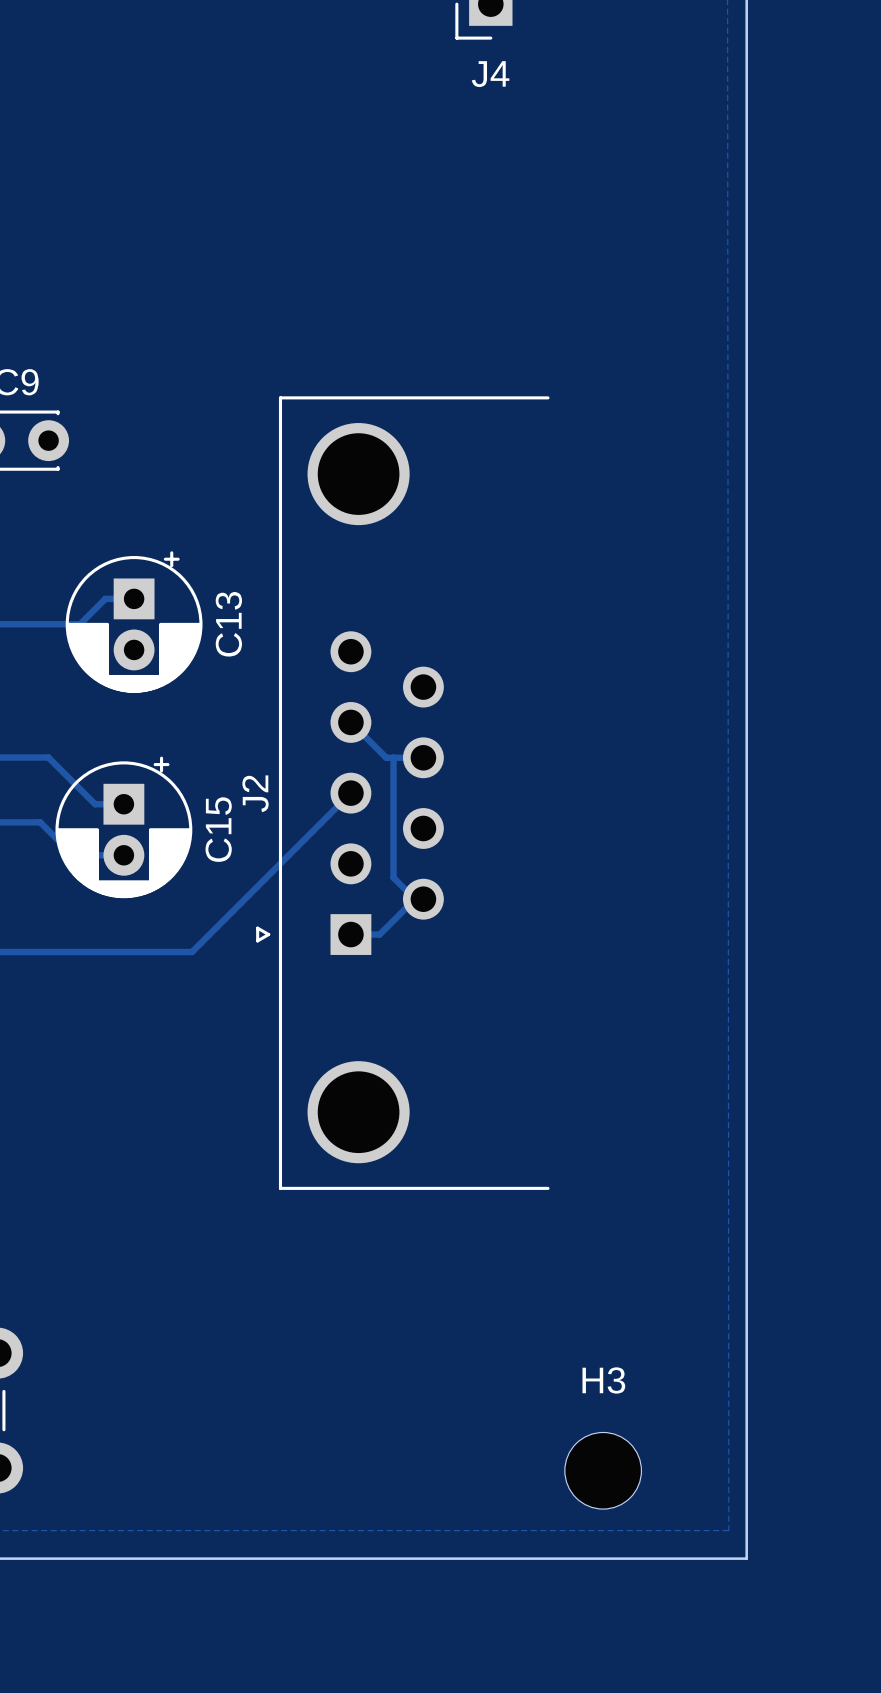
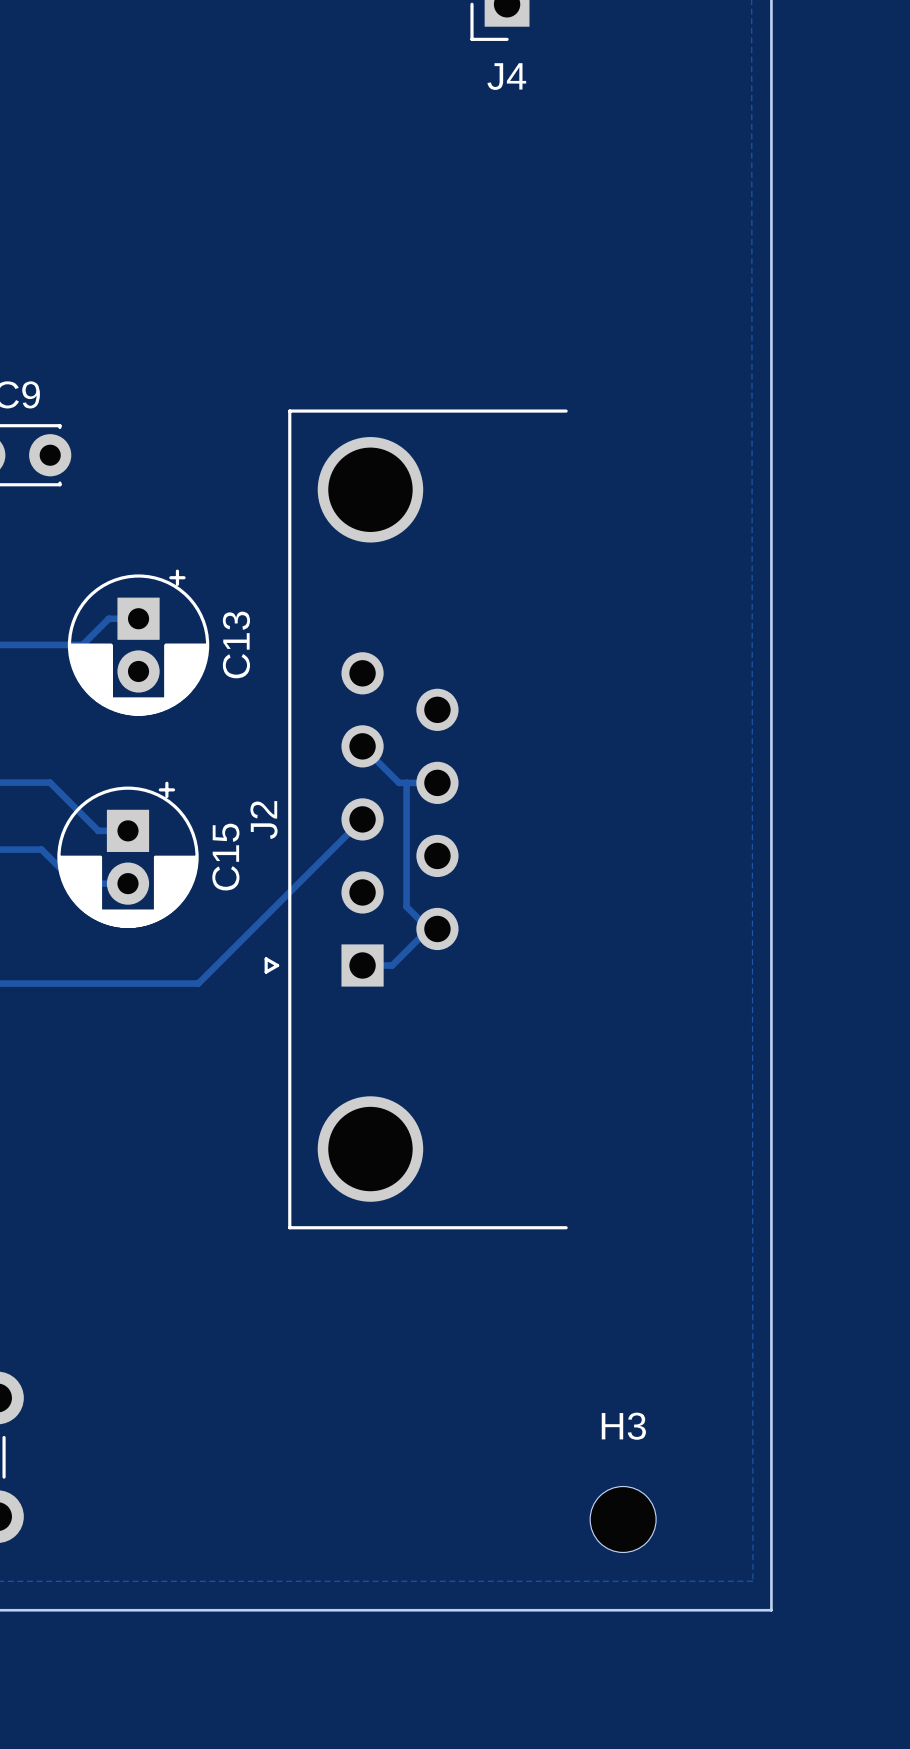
H3 footprint: [564, 1432, 642, 1510] -> [590, 1486, 657, 1553]

